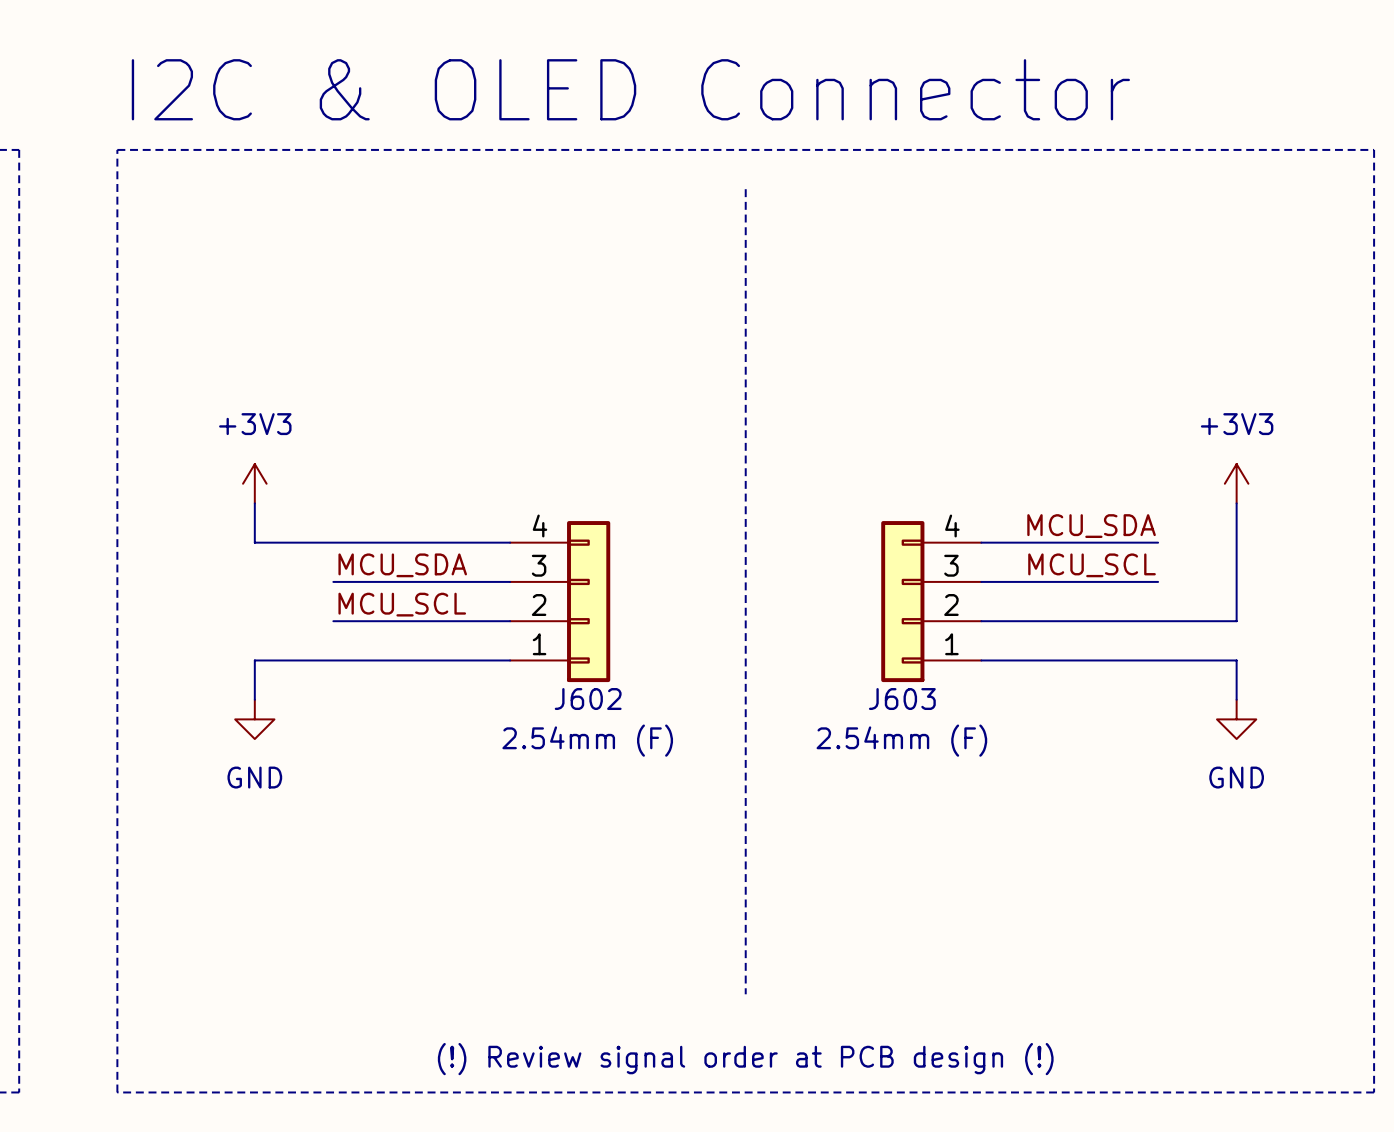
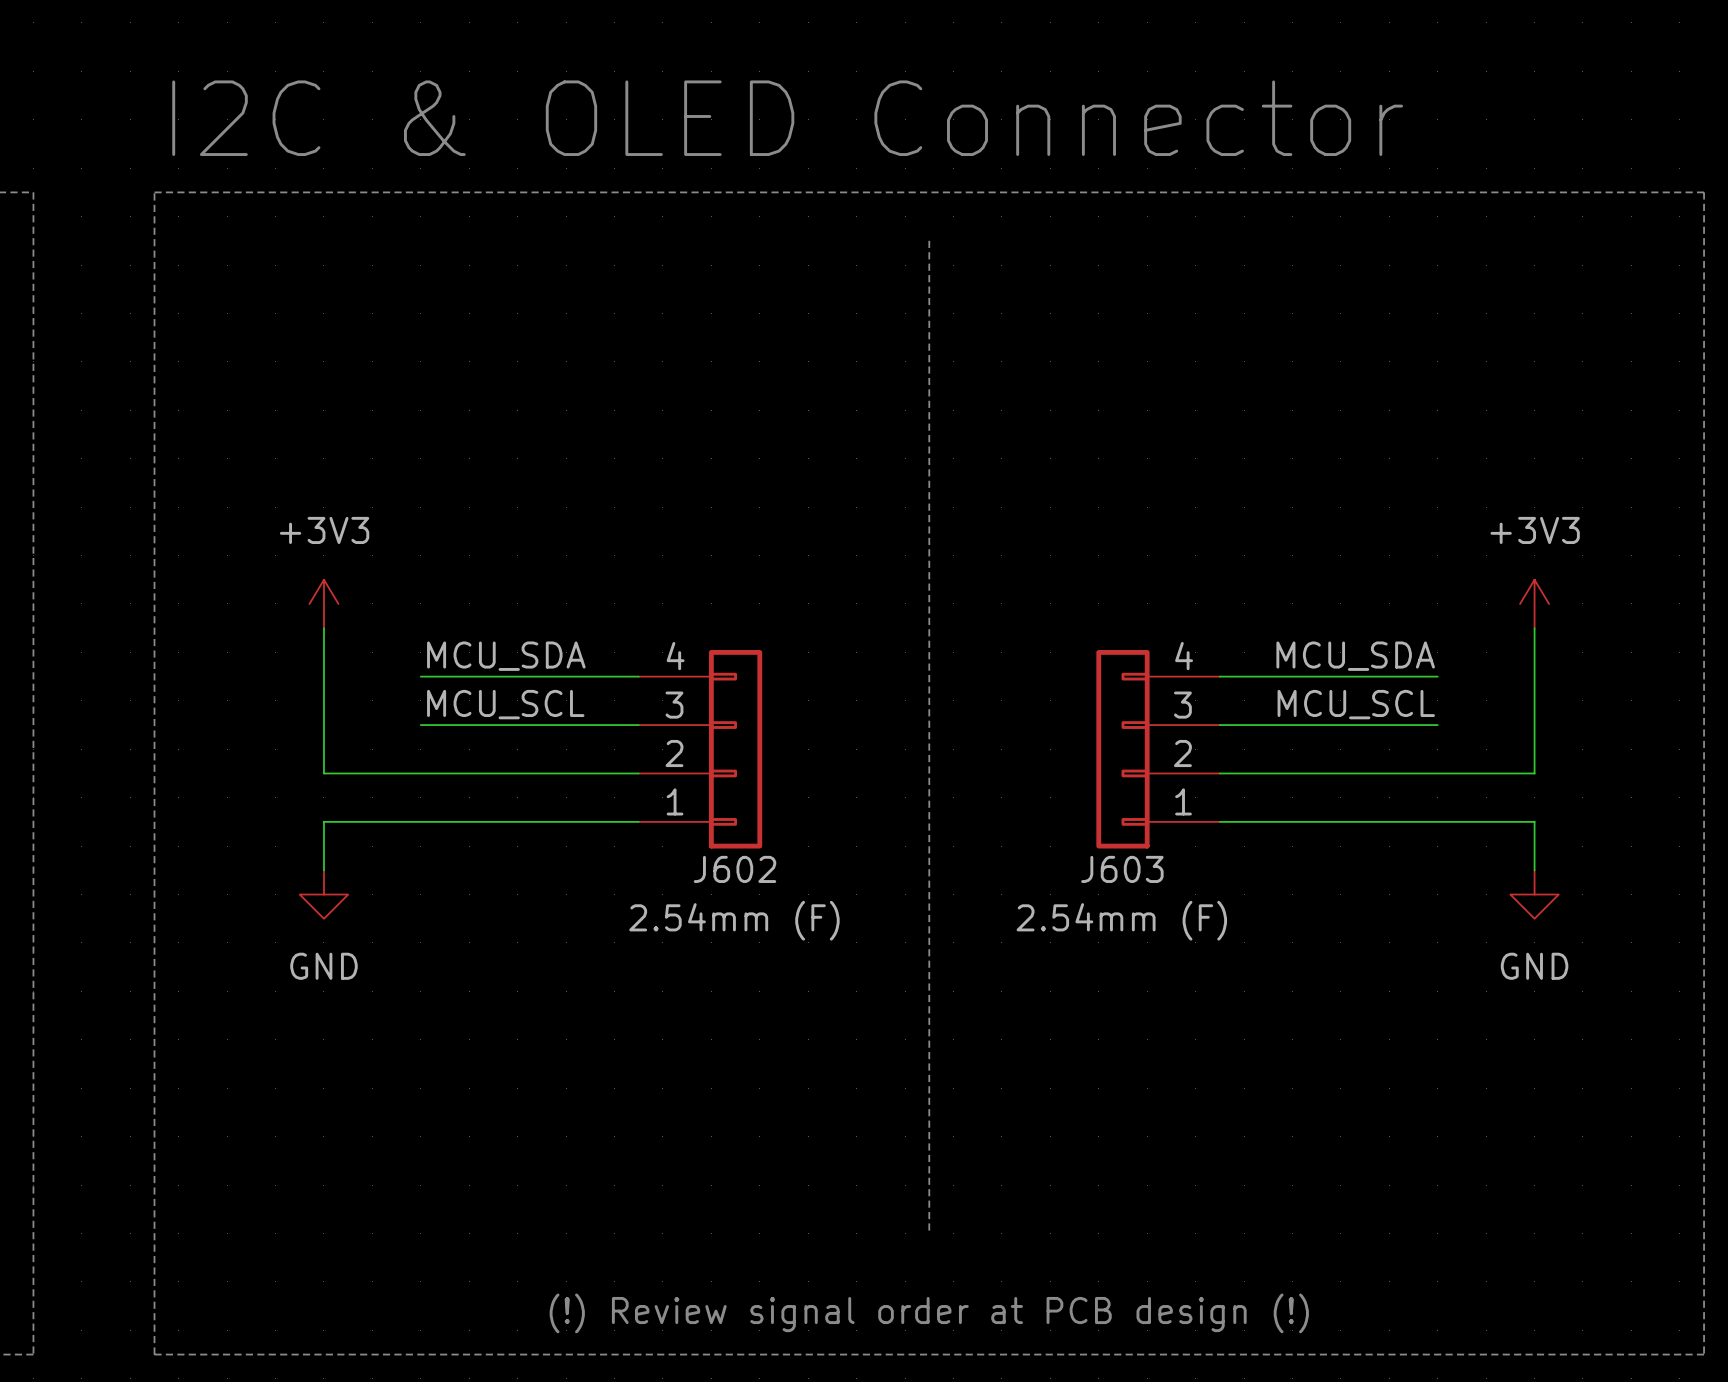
label: none -> MCU_SDA (506, 656)
wire: (254, 542) (333, 542) -> (323, 676) (323, 773) (420, 773)
label: MCU_SDA (402, 565) -> MCU_SCL (505, 704)
label: MCU_SCL (402, 604) -> none

